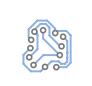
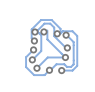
via: (43, 30) -> none
via: none -> (34, 32)
via: (34, 31) -> none
via: none -> (43, 31)
via: none -> (57, 33)
via: (55, 33) -> none
via: none -> (66, 35)
via: (63, 36) -> none

